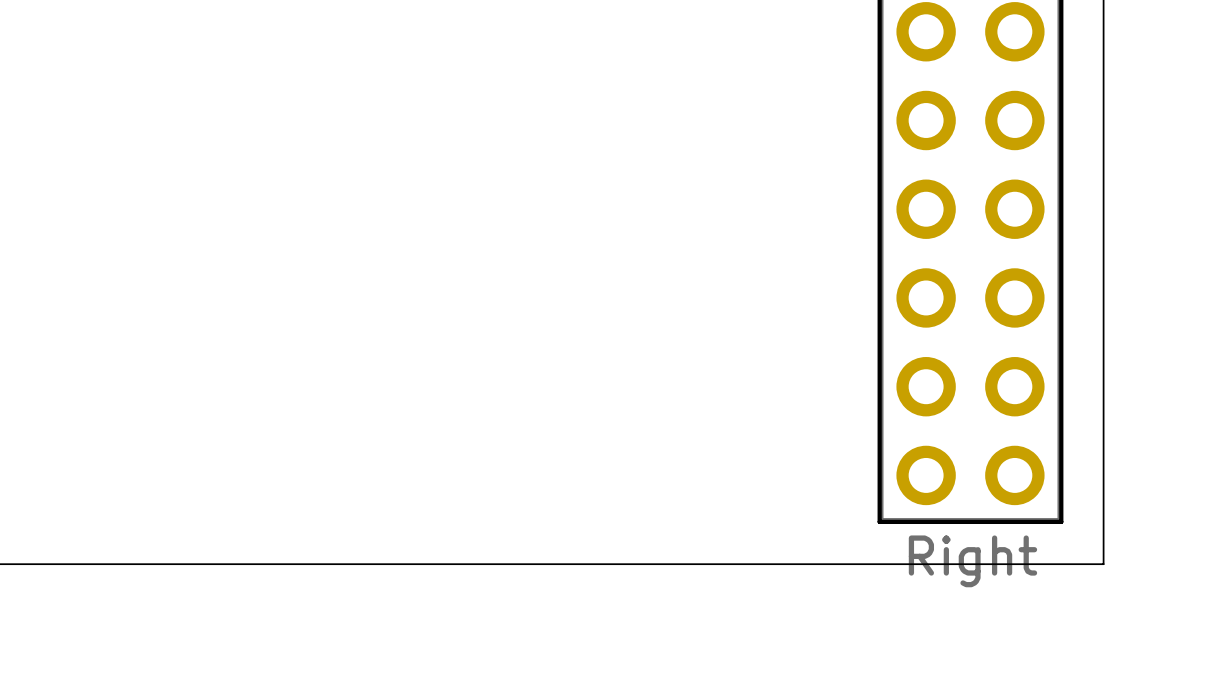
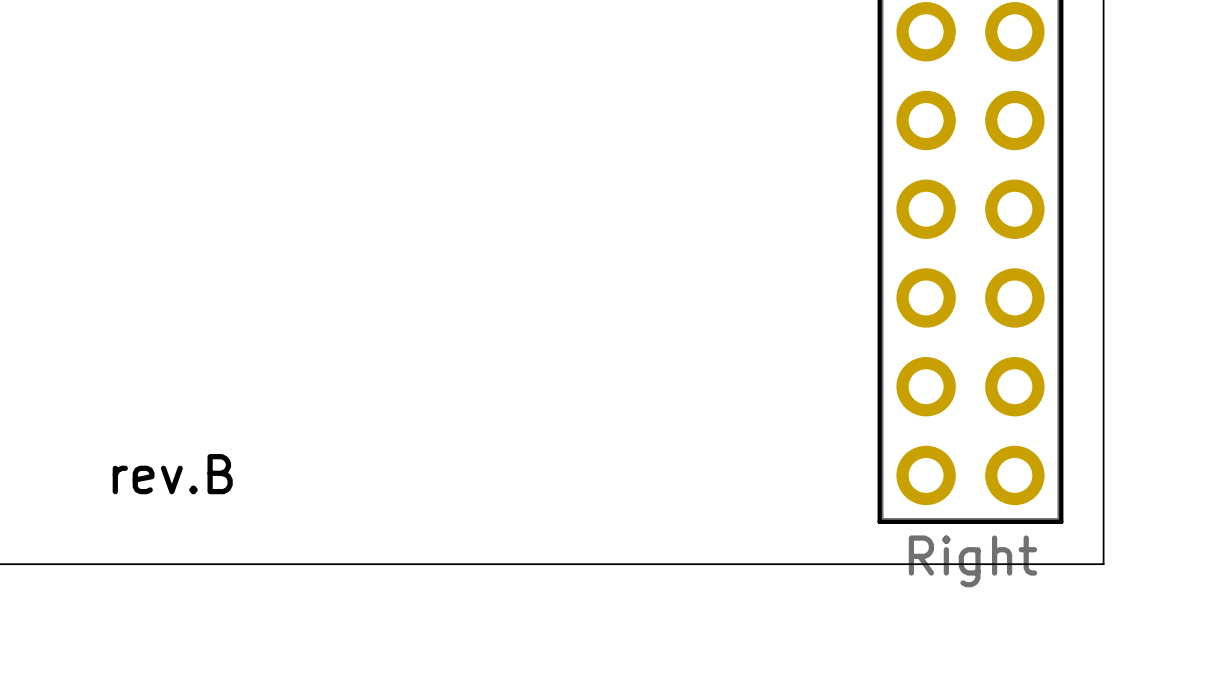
text: none -> rev.B (172, 474)

